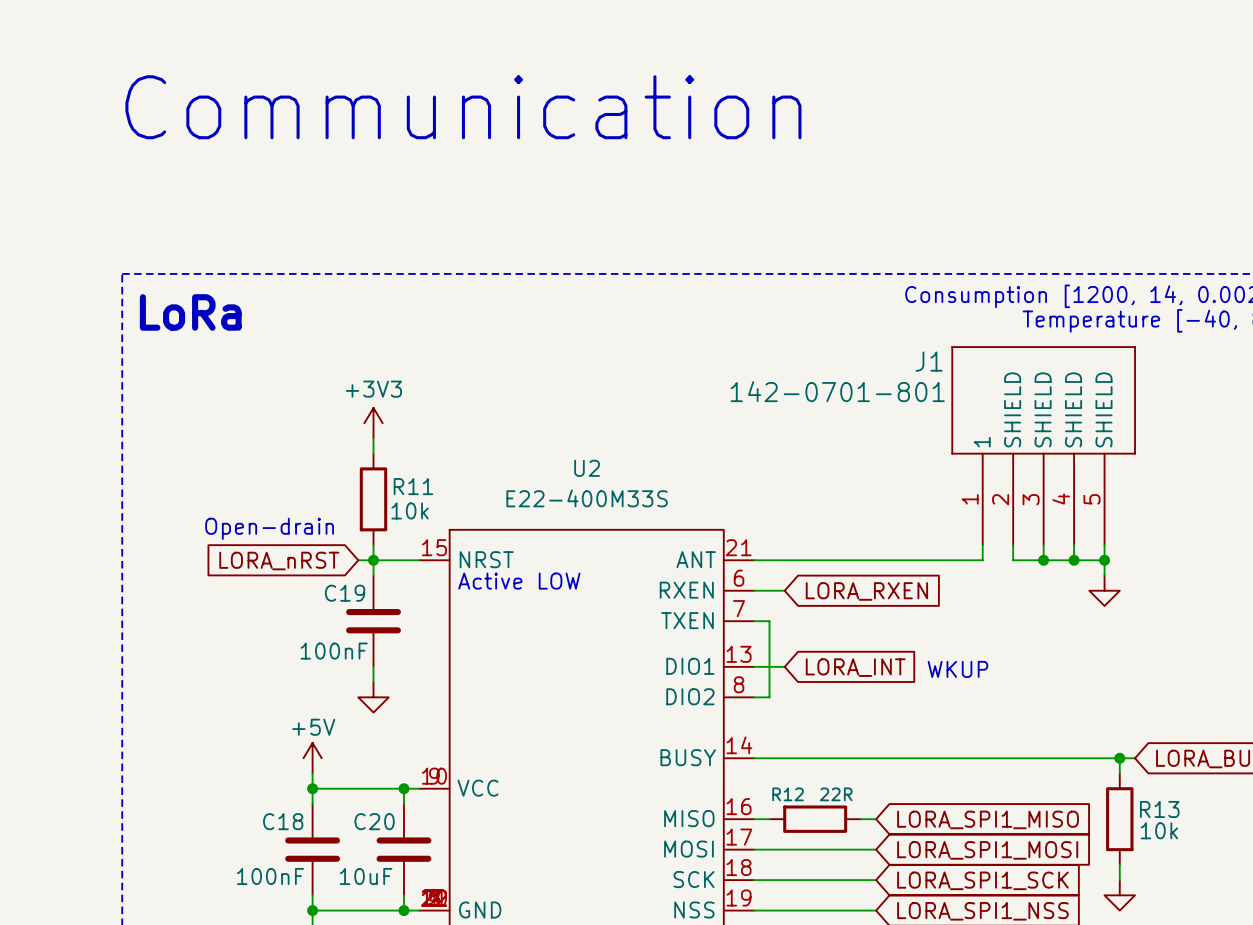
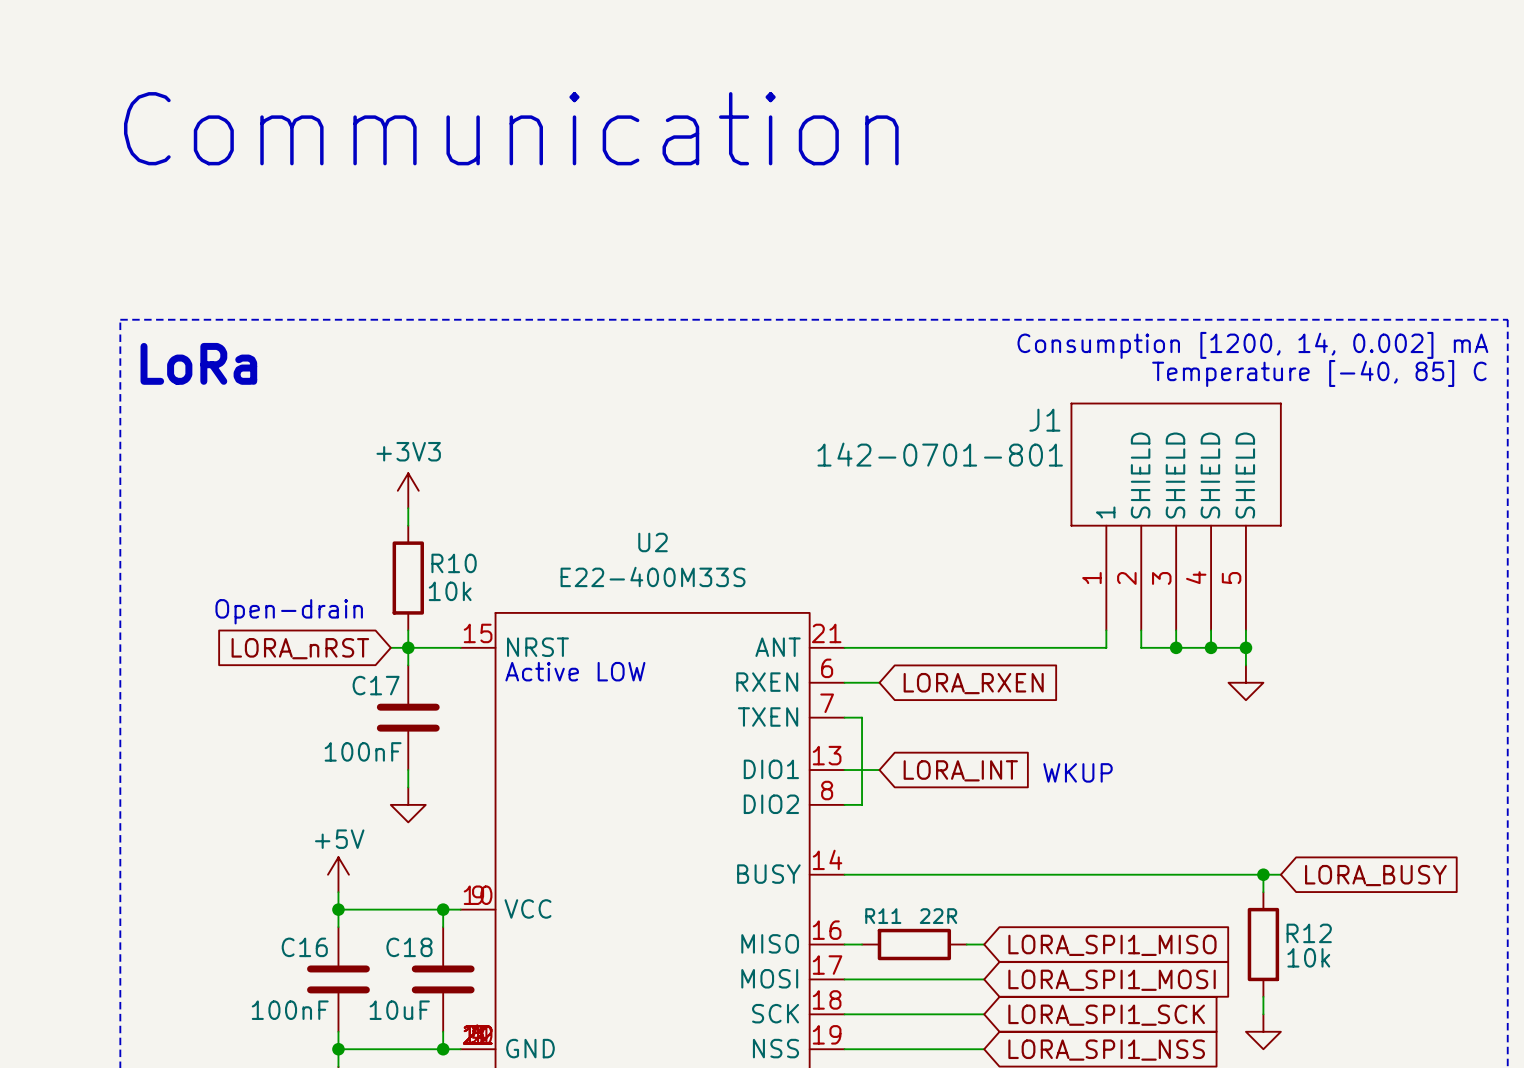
R11 name: R11 (413, 486) -> R10 (454, 563)
C19 name: C19 (345, 593) -> C17 (376, 685)
R12 name: R12 (788, 794) -> R11 (883, 916)
R13 name: R13 (1159, 809) -> R12 (1309, 933)
C18 name: C18 (283, 821) -> C16 (304, 947)
C20 name: C20 (374, 821) -> C18 (409, 947)

